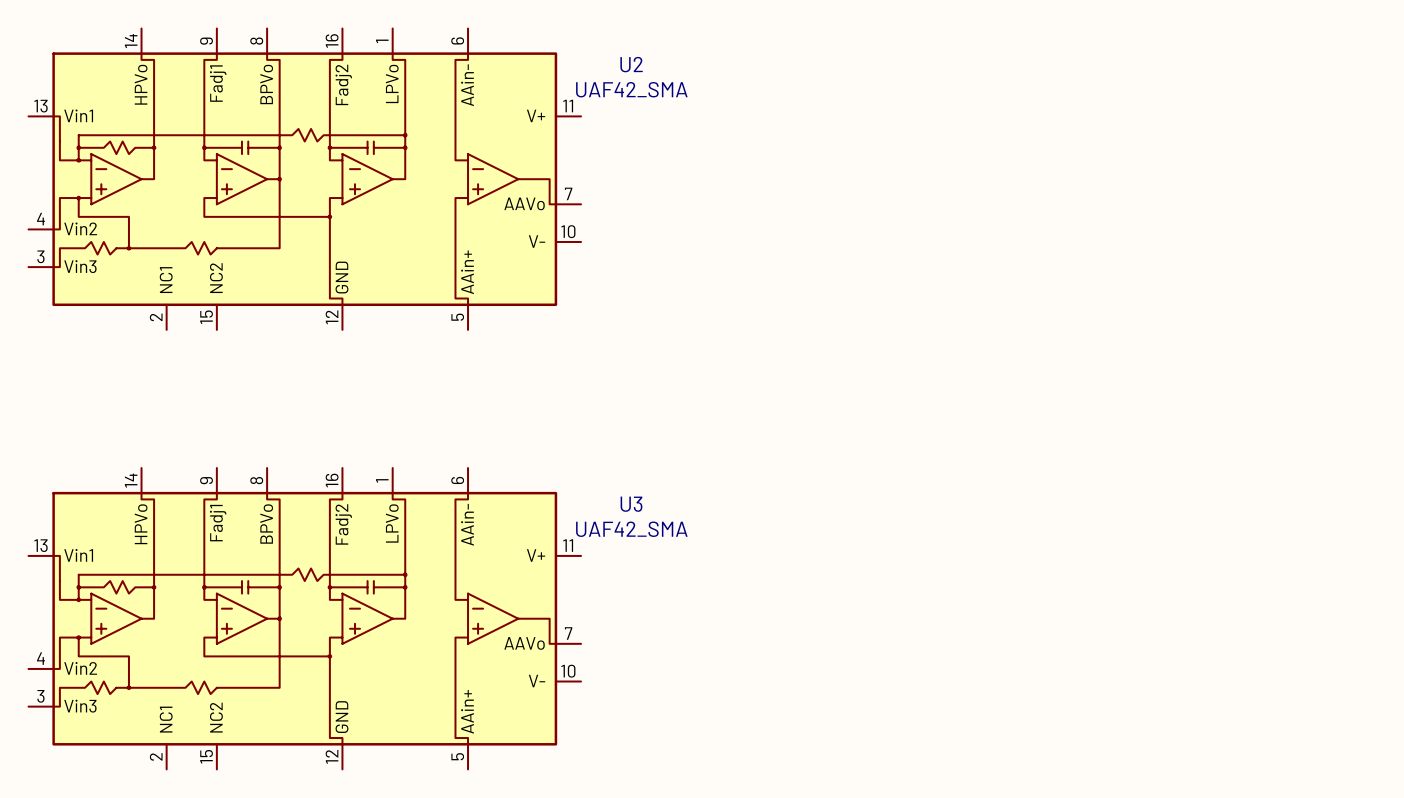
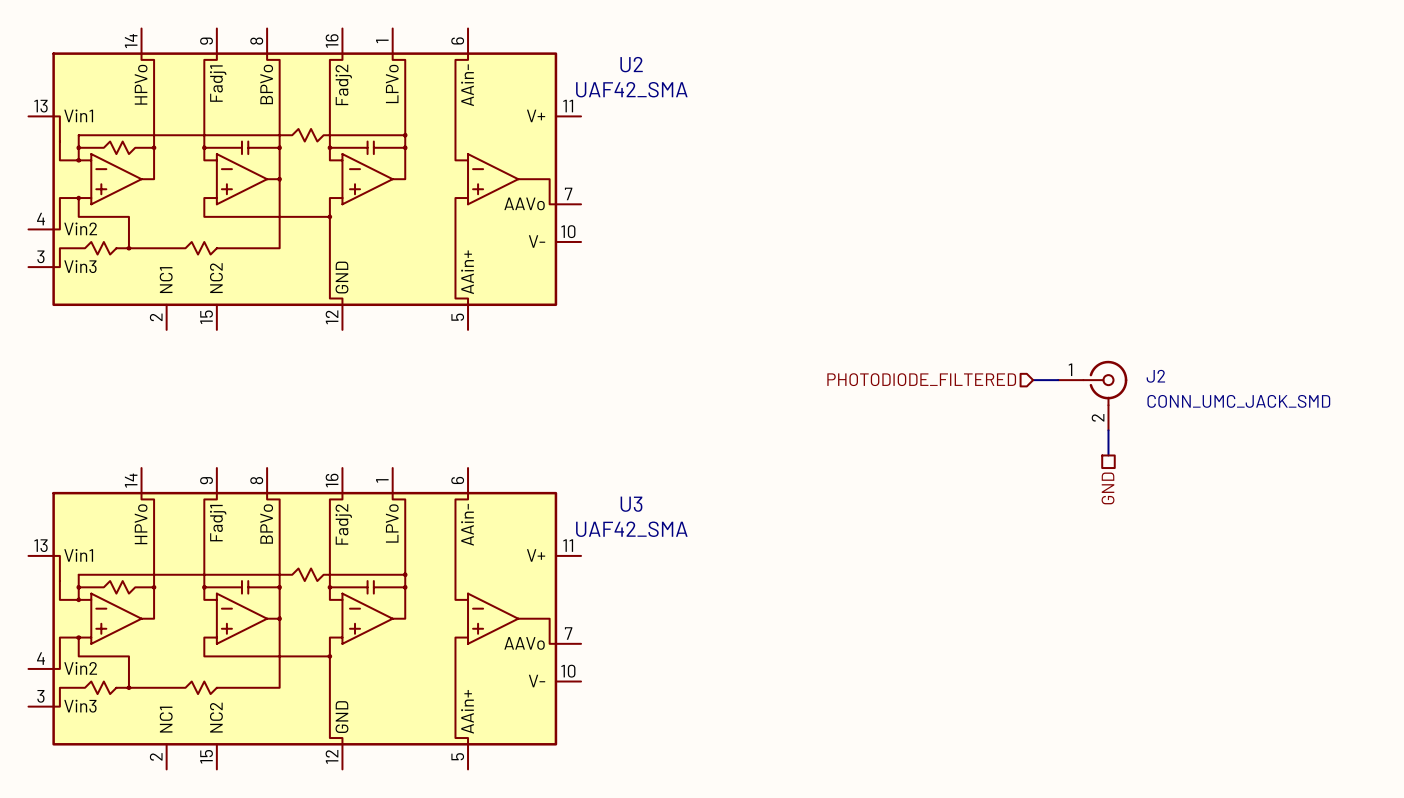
hierarchical label: none -> PHOTODIODE_FILTERED (921, 379)
wire: none -> (1033, 380) (1058, 380)
J2: none -> CONN_UMC_JACK_SMD (1092, 395)
wire: none -> (1108, 430) (1108, 455)
hierarchical label: none -> GND (1108, 488)

